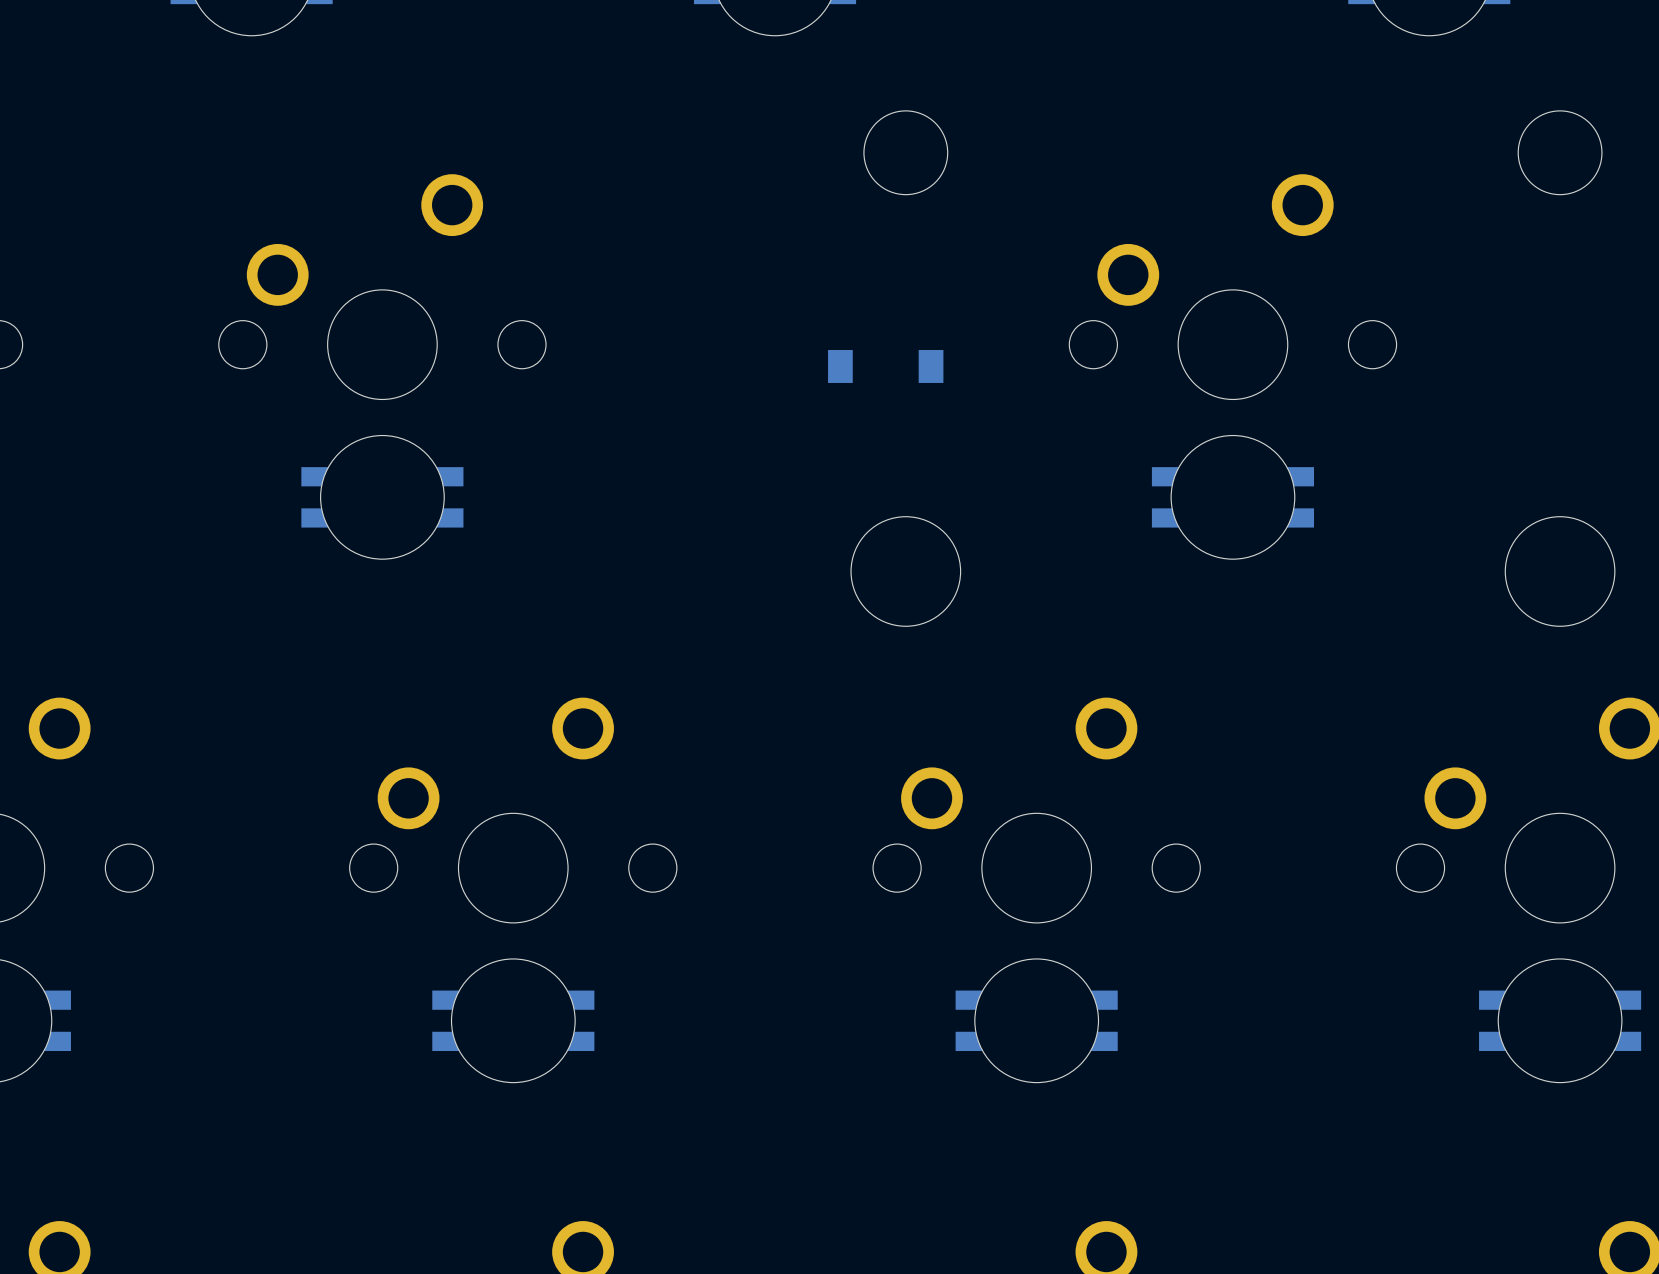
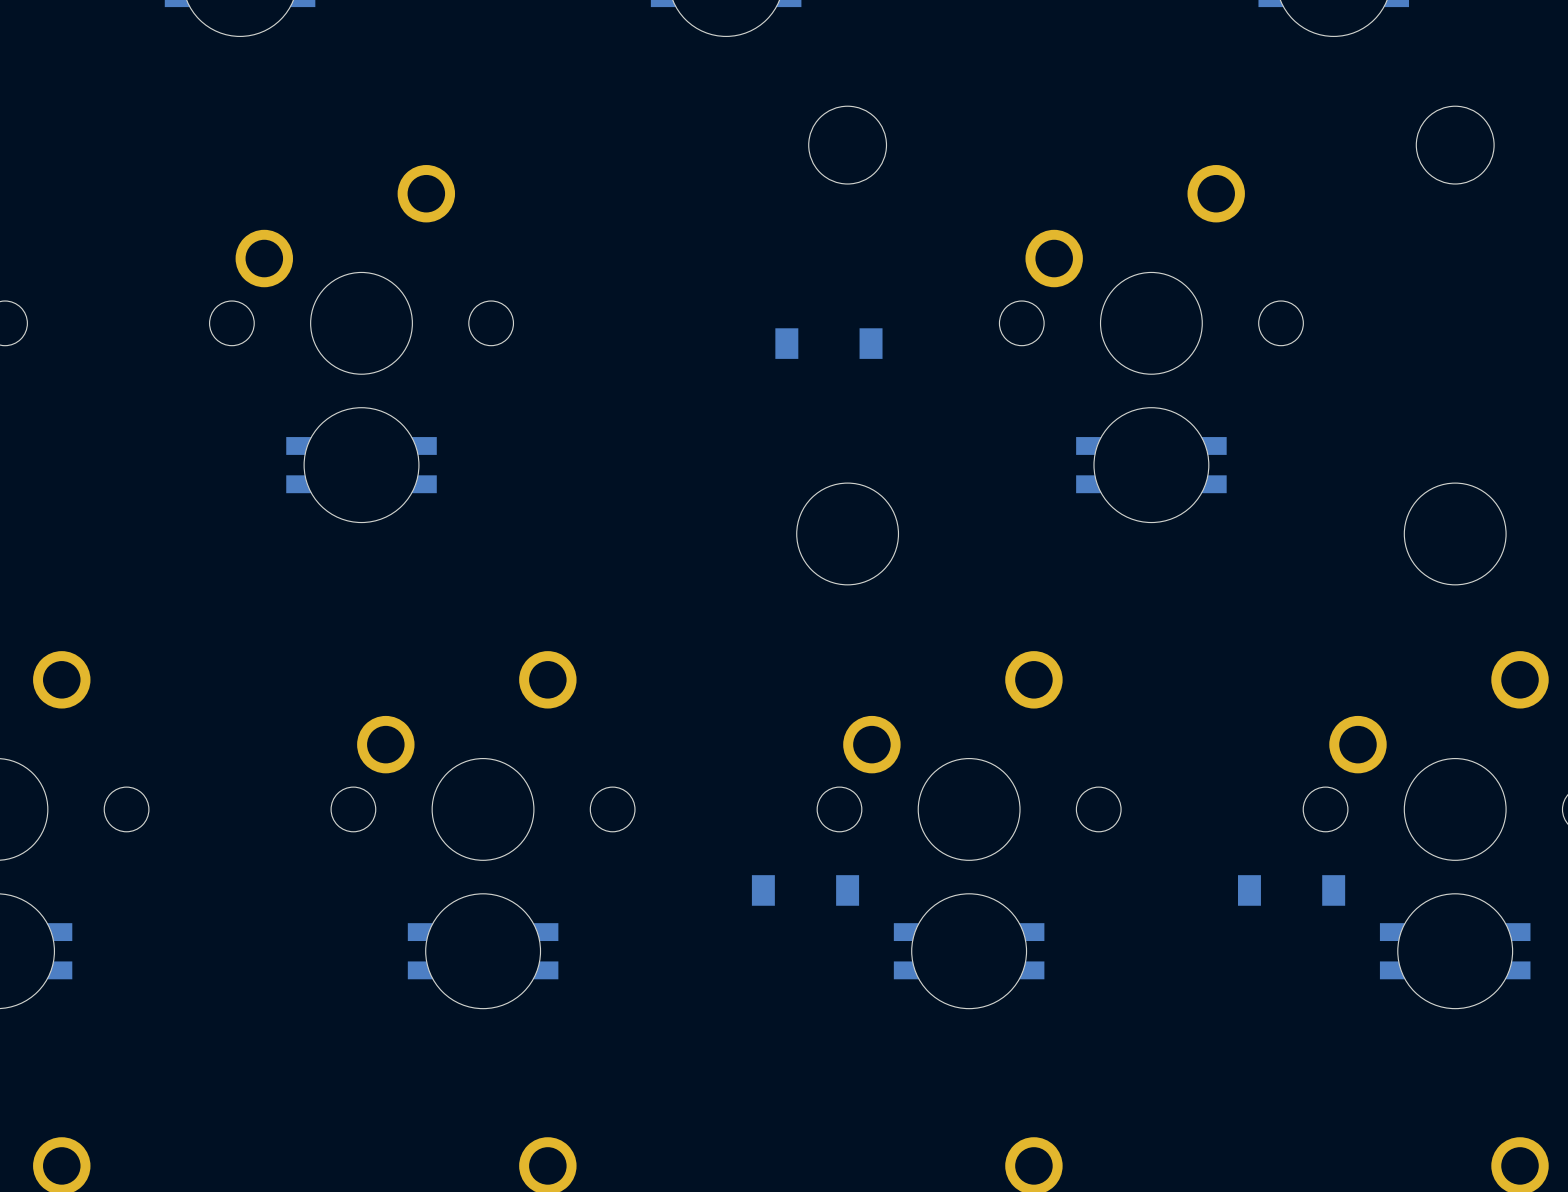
part: none -> (805, 890)
part: none -> (1291, 890)

